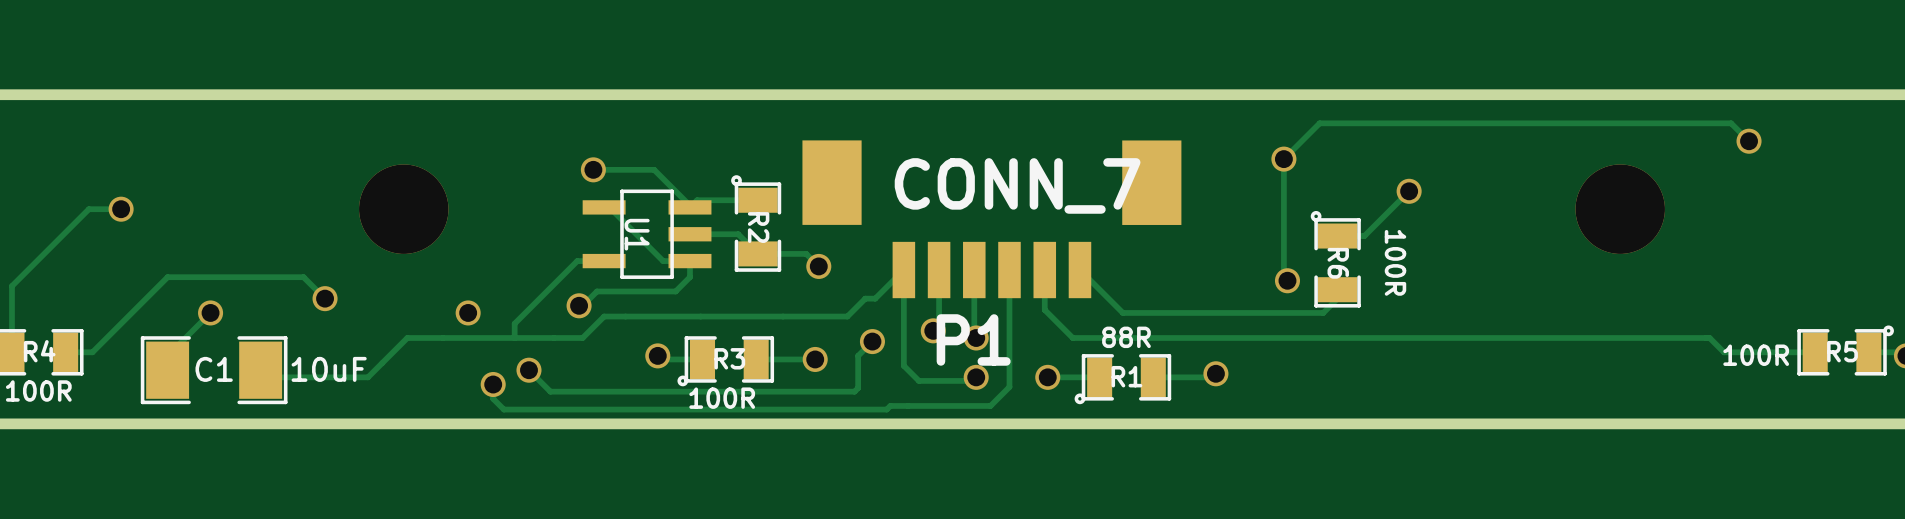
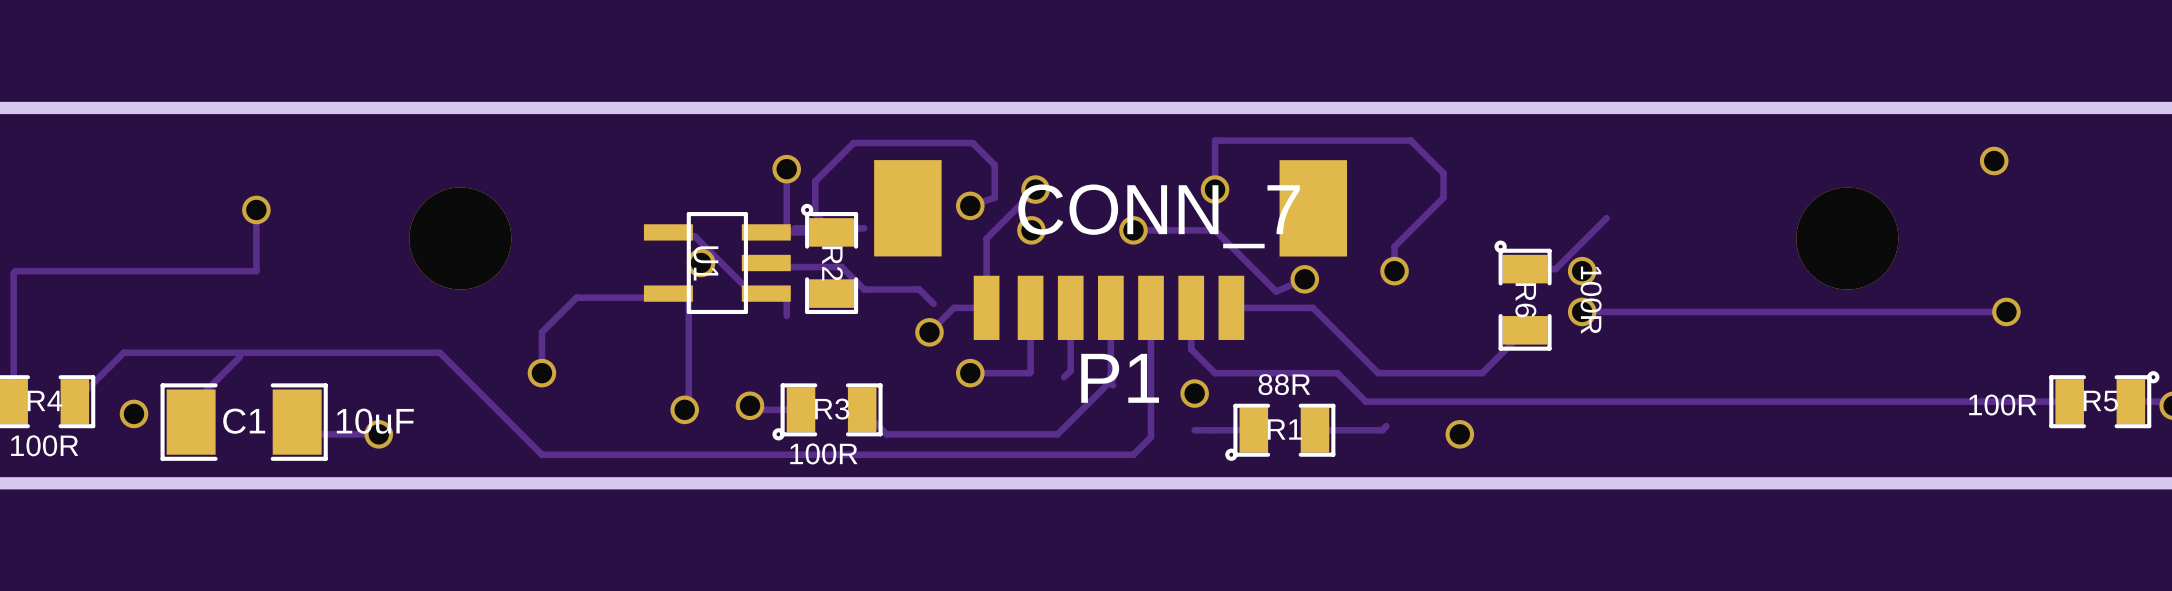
P1 footprint: [802, 140, 1182, 299] -> [874, 160, 1348, 340]
track: (1749, 141) (1731, 123) (1319, 123) (1283, 159) (1283, 277) (1287, 280) -> none
via: none -> (786, 169)
via: (1283, 159) -> none
track: none -> (1035, 189) (986, 238) (986, 307) (953, 307) (929, 332)
via: none -> (1035, 189)
track: none -> (1215, 189) (1215, 140) (1410, 140) (1443, 173) (1443, 197) (1394, 246) (1394, 271)
via: none -> (1215, 189)
track: (593, 169) (654, 169) (689, 205) -> (786, 169) (786, 234)
via: (593, 169) -> none
track: none -> (970, 205) (994, 197) (994, 165) (972, 143) (853, 143) (815, 181) (815, 214) (831, 232) (766, 232)
via: none -> (970, 205)
via: none -> (256, 209)
via: (1409, 191) -> none
via: none -> (1031, 230)
track: none -> (1133, 230) (1215, 230) (1276, 291) (1304, 279)
via: none -> (1133, 230)
track: (121, 209) (88, 209) (11, 286) -> (256, 209) (256, 271) (15, 271) (13, 273) (13, 326)
via: (121, 209) -> none
R2 position: (756, 223) -> (829, 258)
via: none -> (701, 263)
U1 position: (647, 234) -> (717, 263)
via: none -> (1394, 271)
via: none -> (1582, 271)
via: none -> (1304, 279)
track: (577, 261) (514, 323) (514, 338) -> (658, 297) (576, 297) (541, 332) (541, 373)
track: none -> (688, 297) (688, 405) (684, 409)
via position: (818, 266) -> (929, 332)
track: (900, 266) (903, 270) (875, 298) (865, 298) (847, 316) (604, 316) (582, 338) (407, 338) (367, 377) (267, 377) -> (378, 434) (309, 434) (305, 430)
track: (1079, 270) (1122, 312) (1323, 312) (1337, 298) (1337, 289) -> (1231, 307) (1312, 307) (1378, 373) (1482, 373) (1525, 330)
via: none -> (1582, 311)
track: none -> (2006, 311) (1582, 311)
via: none -> (2006, 311)
track: (689, 277) (675, 291) (596, 291) (582, 305) (579, 305) -> none
via: (1287, 280) -> none
track: (325, 298) (303, 277) (167, 277) (92, 352) (65, 352) -> none
via: (325, 298) -> none
via: (579, 305) -> none
track: (1044, 306) (1044, 309) (1072, 338) (1709, 338) (1723, 352) -> (1191, 349) (1215, 373) (1337, 373) (1365, 401) (1965, 401)
via: (210, 312) -> none
via position: (468, 312) -> (541, 373)
track: (903, 326) (903, 365) (918, 380) -> (1030, 372) (970, 373)
via: (933, 330) -> none
via: (976, 338) -> none
track: (872, 341) (858, 355) (858, 388) (854, 391) (550, 391) (528, 370) -> none
via position: (872, 341) -> (970, 373)
via: none -> (684, 409)
track: (815, 359) (756, 359) -> (1047, 434) (886, 434) (862, 409)
via: (815, 359) -> none
via: none -> (134, 413)
via: (528, 370) -> none
via: (1215, 373) -> none
track: (976, 377) (972, 380) (927, 380) -> (1110, 375) (1113, 378) (1057, 434)
via: (976, 377) -> none
via position: (1047, 377) -> (1194, 393)
via: none -> (378, 434)
via: none -> (1459, 434)
track: (1009, 383) (1009, 387) (990, 405) (890, 405) (886, 409) (503, 409) (493, 398) (493, 384) -> (1151, 437) (1133, 454) (541, 454) (439, 352) (123, 352) (74, 401)
via: (493, 384) -> none

